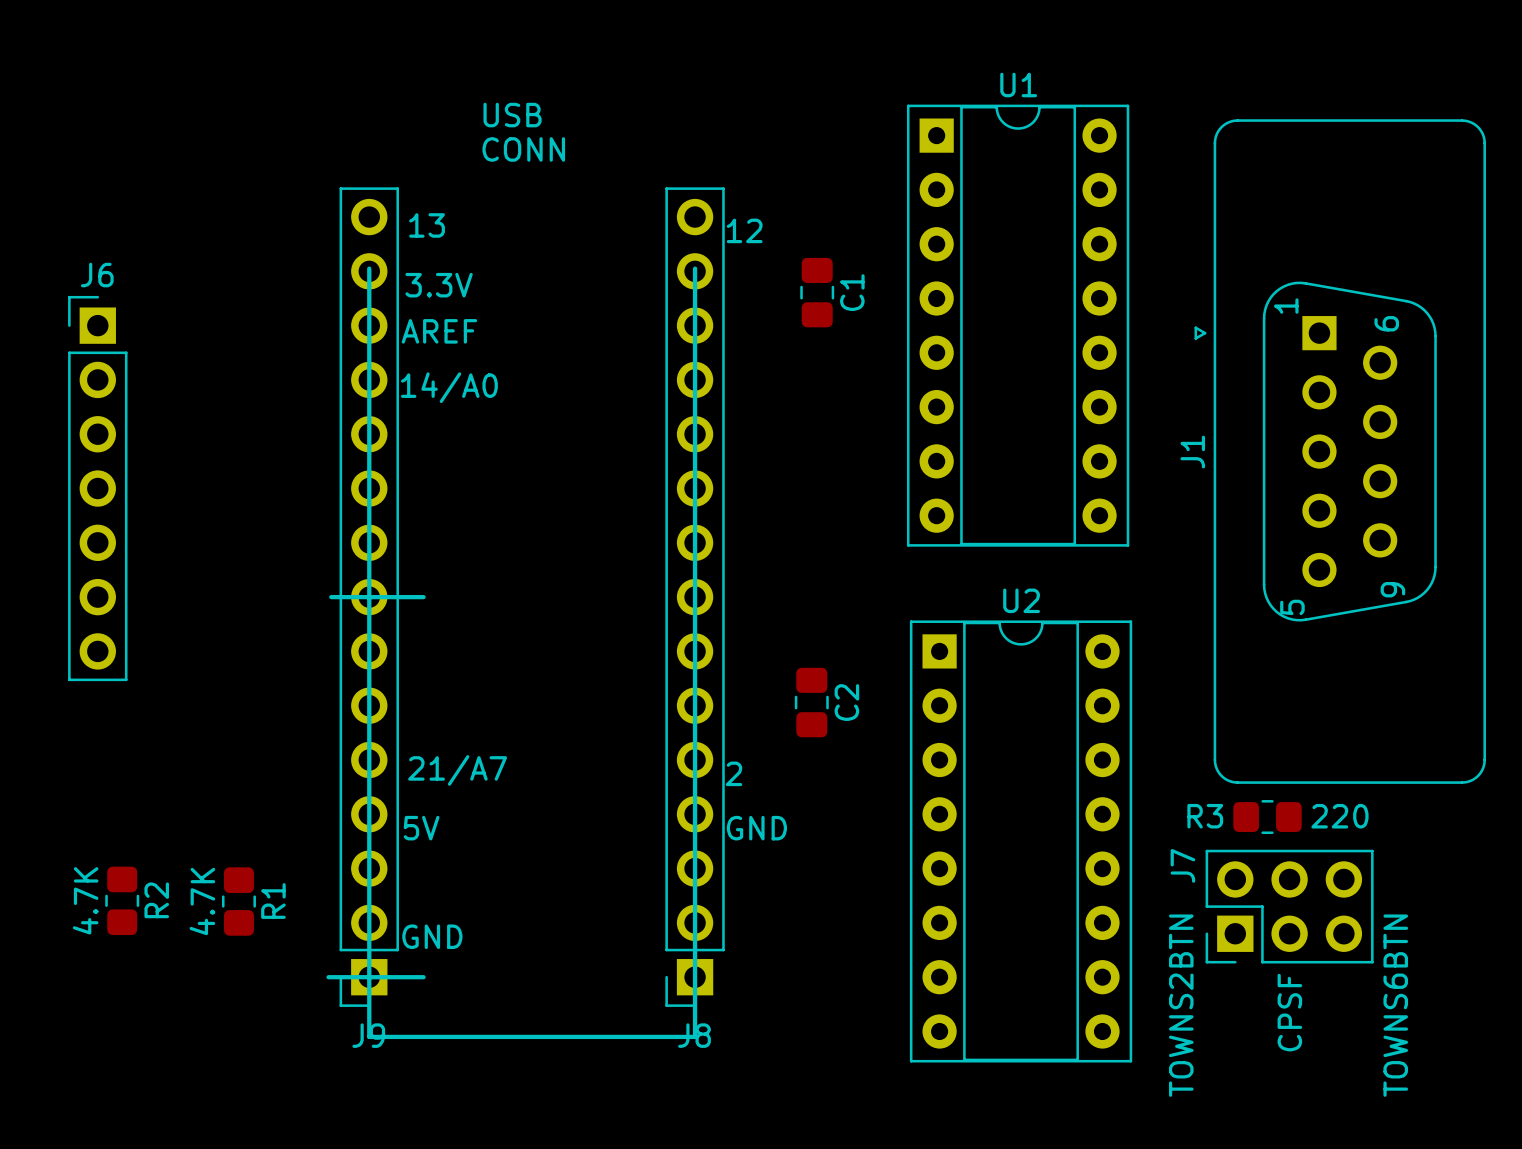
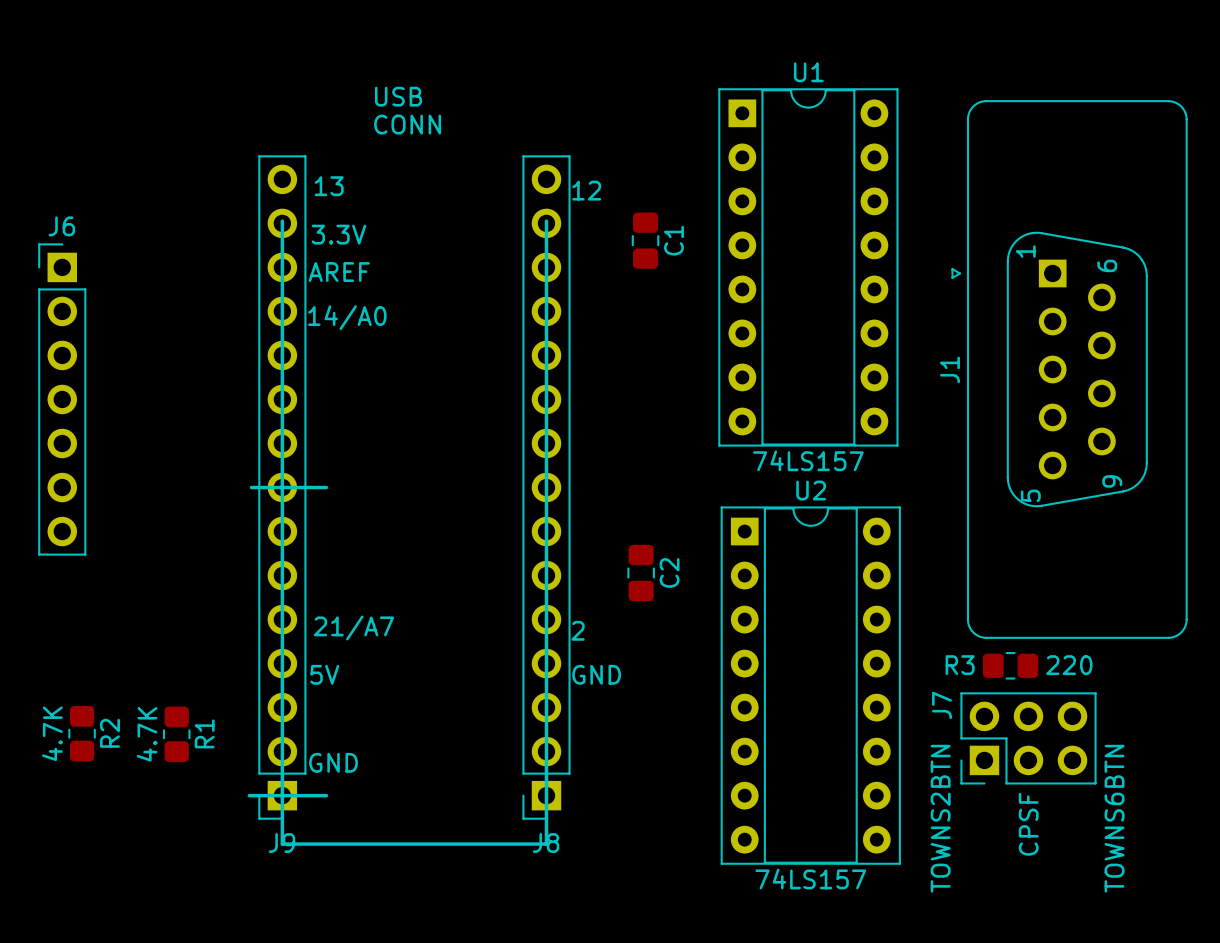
U1 value: none -> 74LS157 (808, 460)
U2 value: none -> 74LS157 (810, 878)

